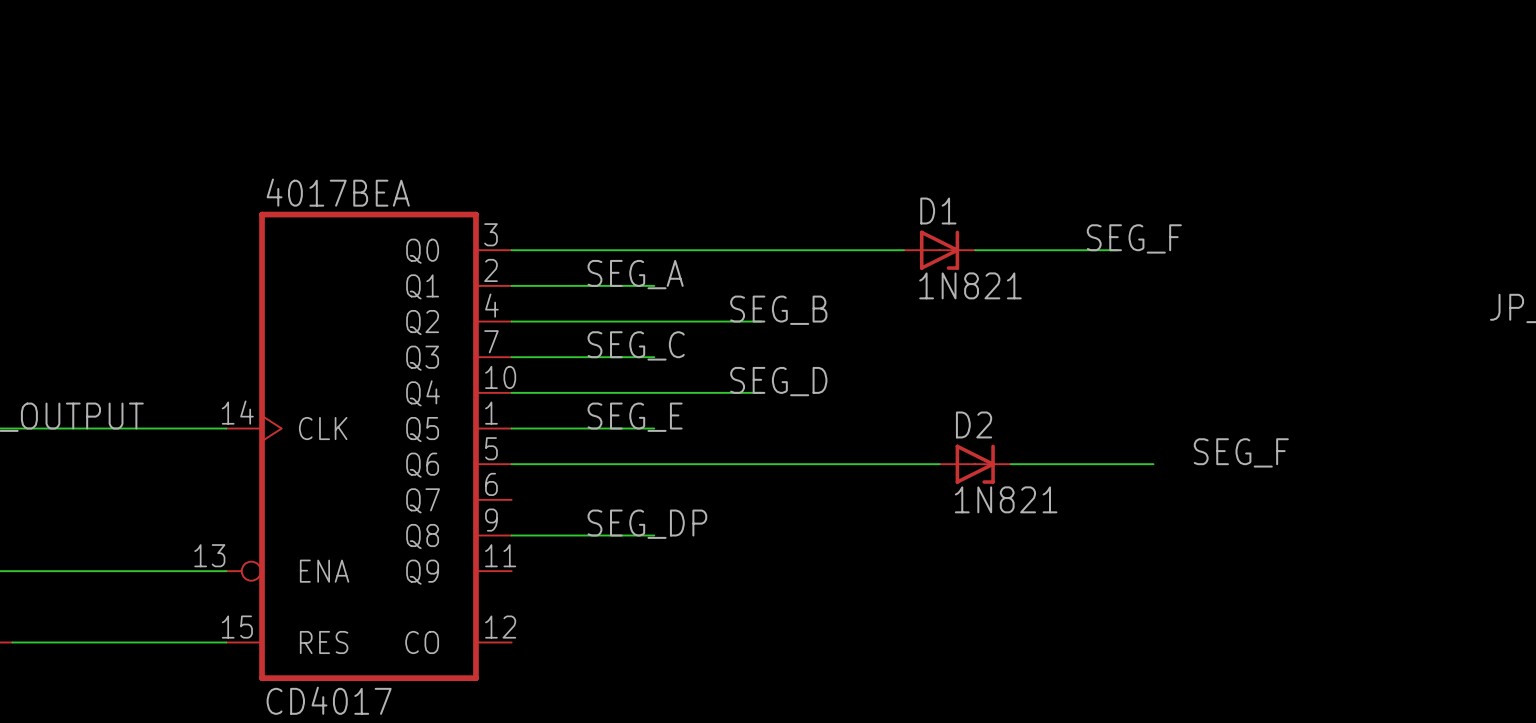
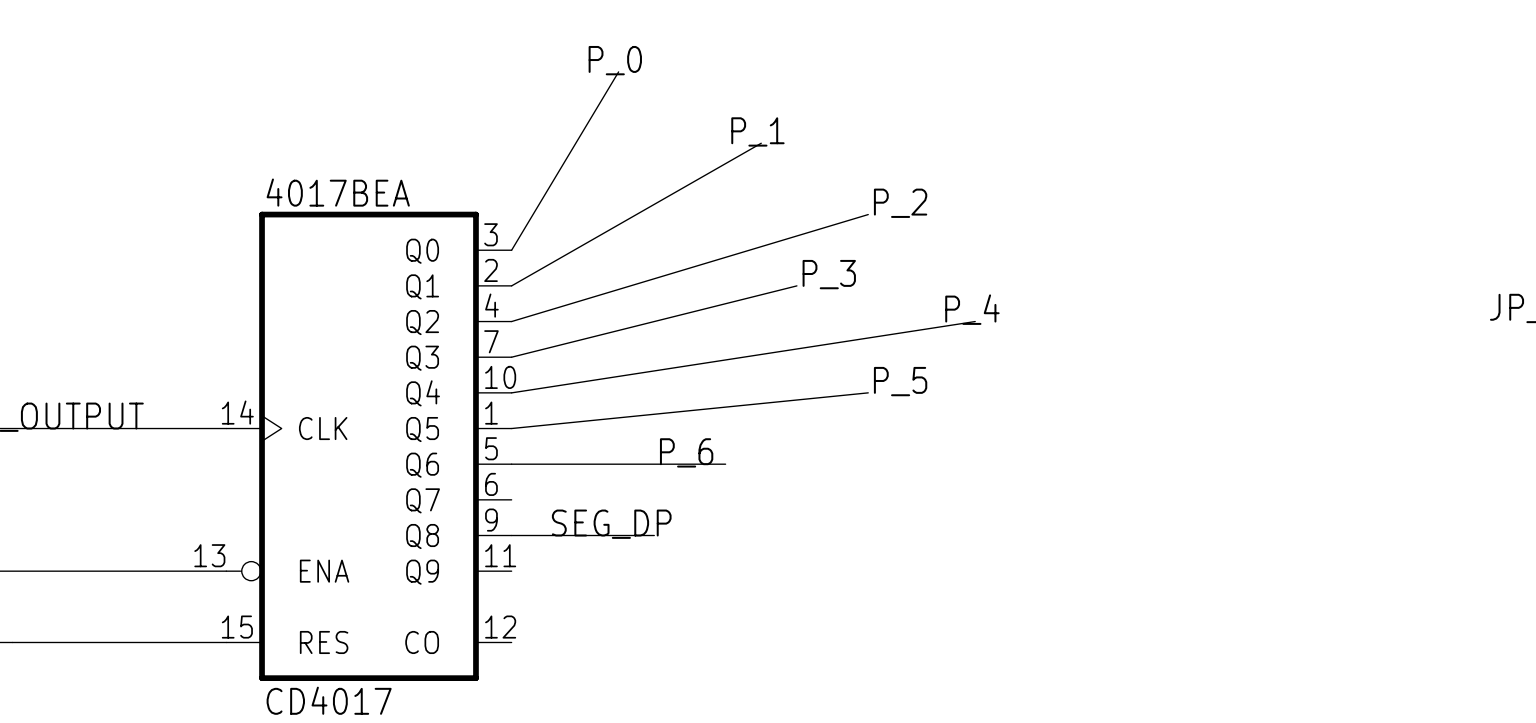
label: none -> P_0 (615, 60)
label: none -> P_1 (757, 131)
label: none -> P_2 (900, 203)
label: SEG_F (1134, 238) -> none
wire: (511, 250) (903, 250) -> (511, 250) (618, 71)
D1: 1N821 (939, 250) -> none
wire: (975, 250) (1117, 250) -> none
label: SEG_A (635, 274) -> none
label: none -> P_3 (829, 274)
wire: (511, 285) (654, 285) -> (511, 285) (761, 143)
label: none -> P_4 (972, 309)
label: SEG_B (778, 310) -> none
wire: (511, 321) (761, 321) -> (511, 321) (868, 214)
label: SEG_C (636, 345) -> none
wire: (511, 357) (654, 357) -> (511, 357) (796, 285)
label: SEG_D (778, 381) -> none
label: none -> P_5 (900, 381)
wire: (511, 392) (761, 392) -> (511, 392) (975, 321)
label: SEG_E (635, 417) -> none
wire: (511, 428) (654, 428) -> (511, 428) (868, 392)
label: none -> P_6 (686, 452)
label: SEG_F (1241, 452) -> none
wire: (725, 464) (939, 464) -> none
D2: 1N821 (975, 464) -> none
wire: (1010, 464) (1153, 464) -> none
label position: SEG_DP (647, 524) -> SEG_DP (611, 524)

